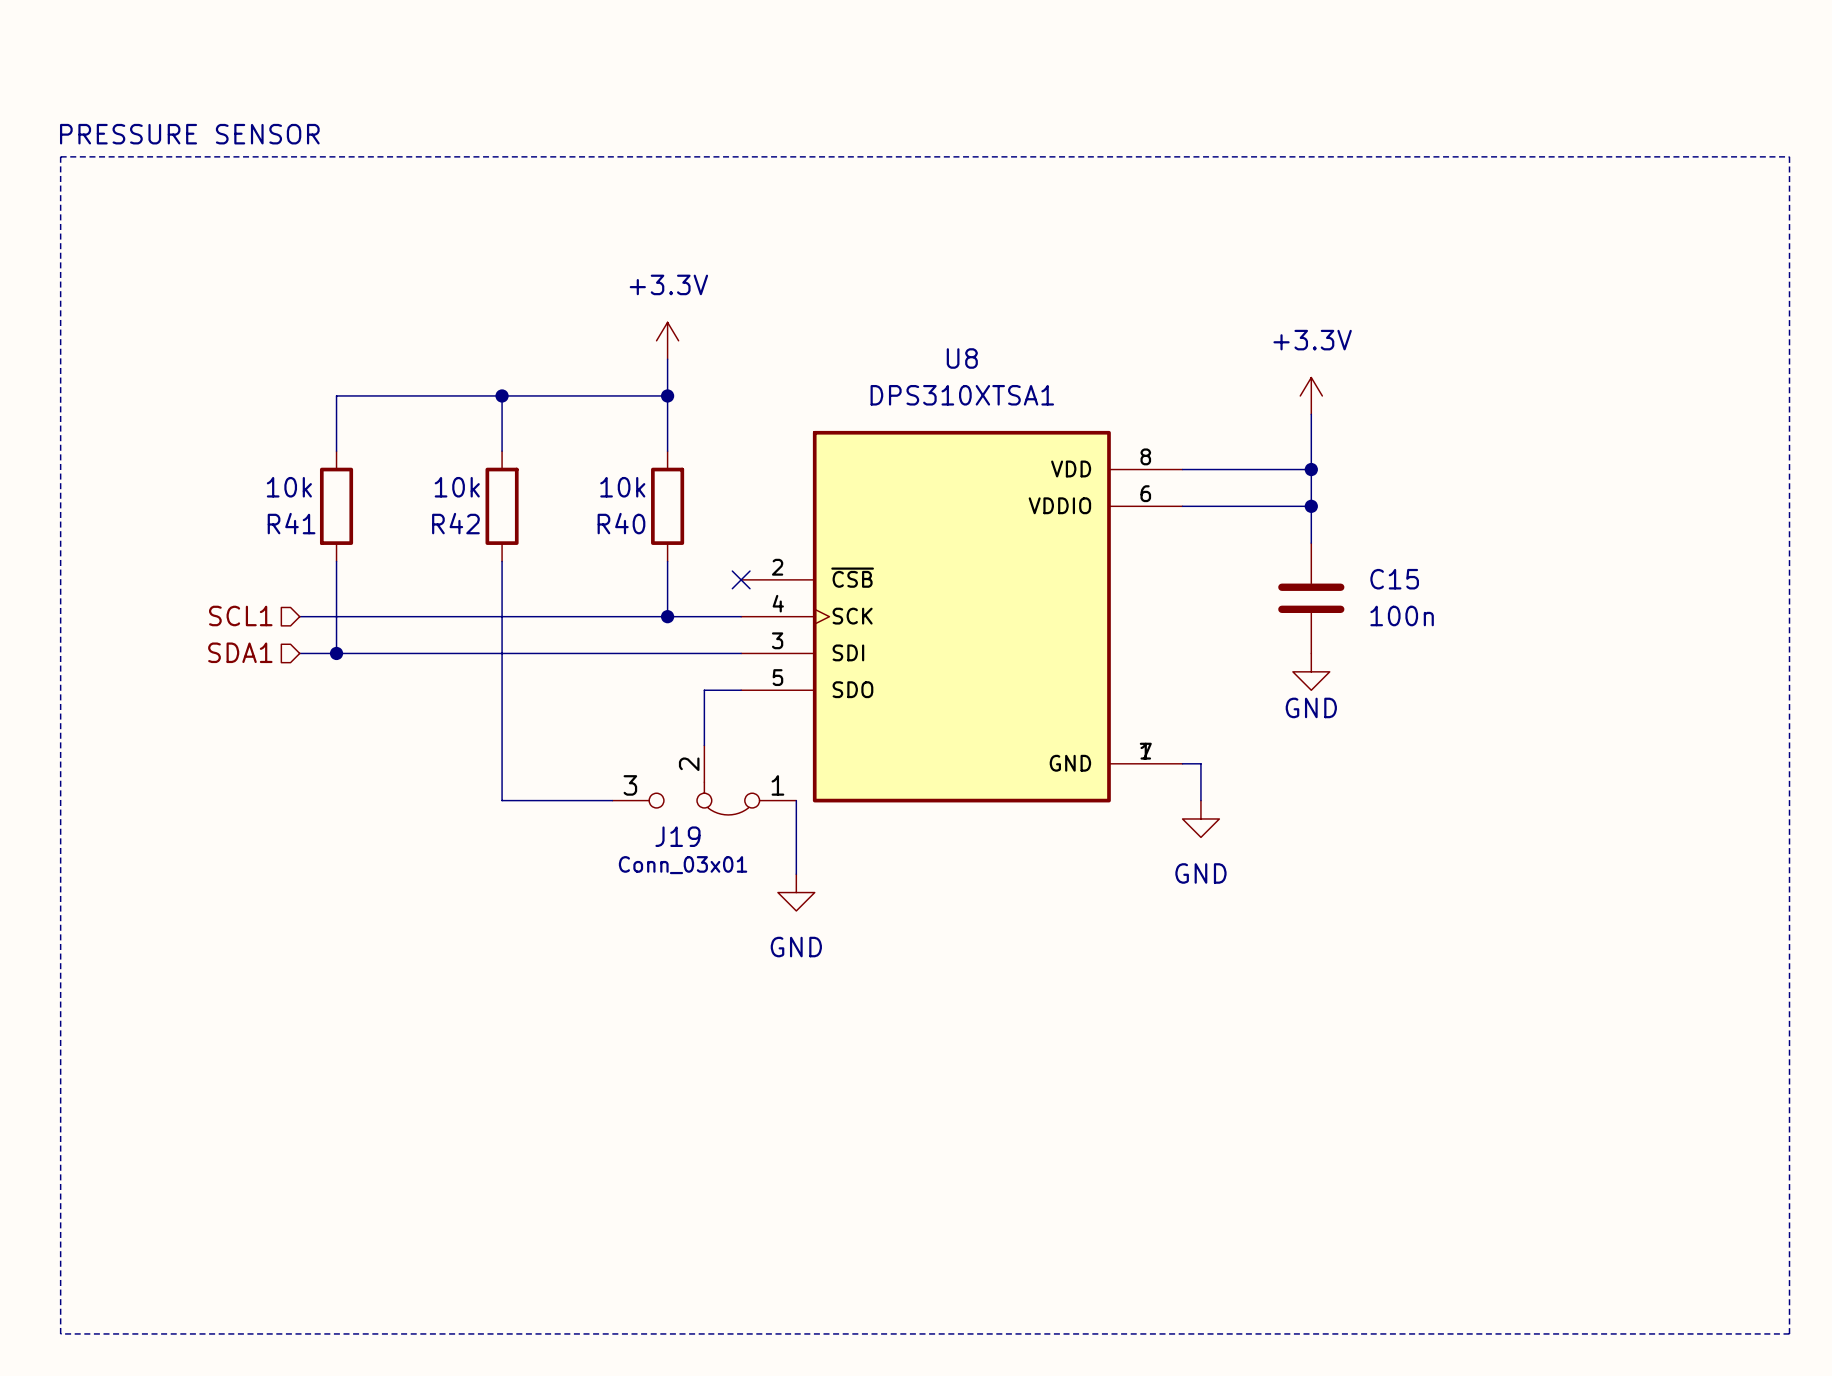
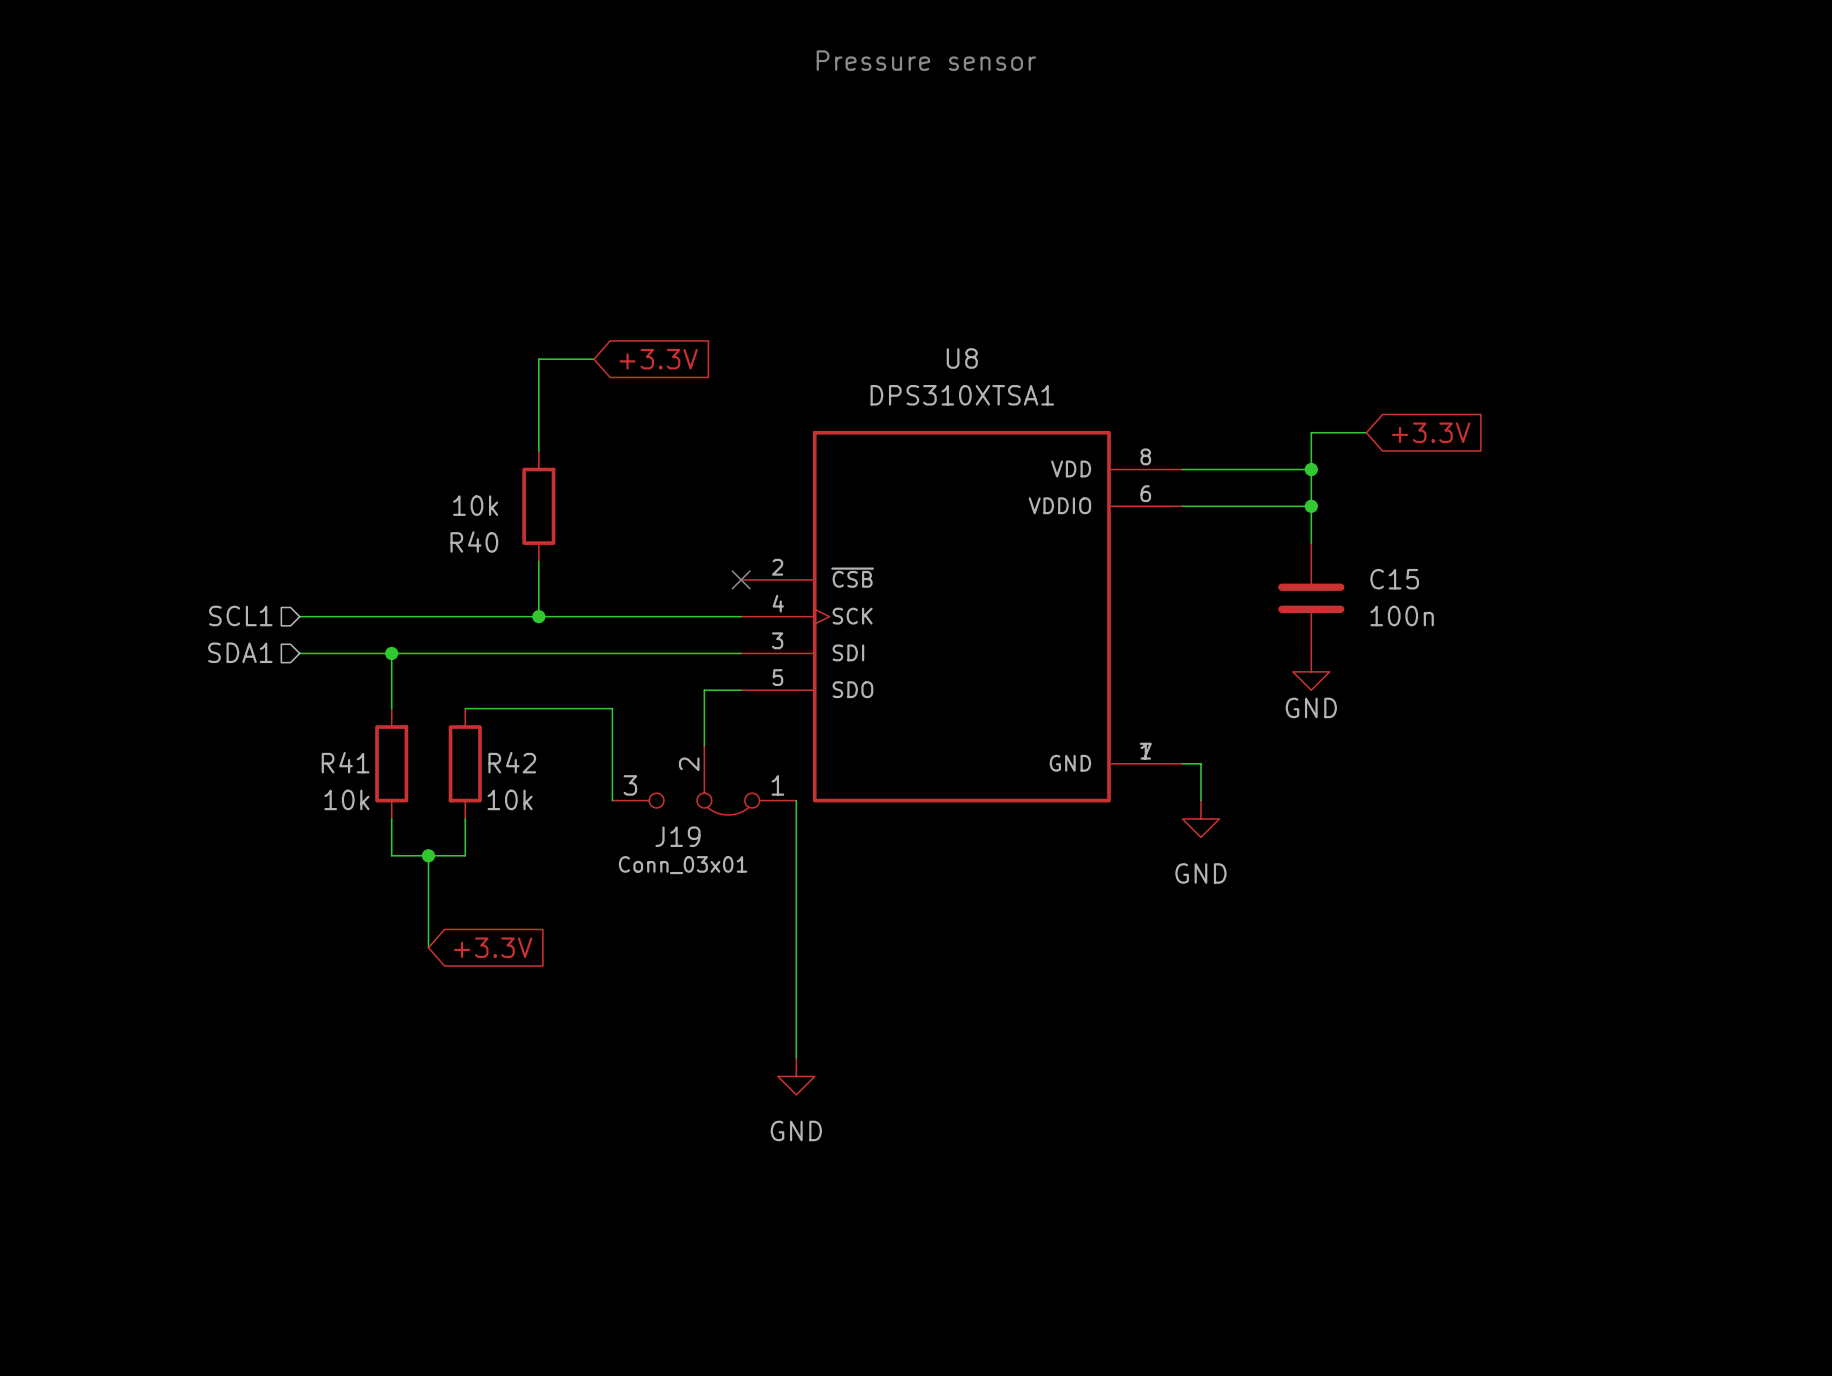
text: none -> Pressure sensor (926, 60)
text: PRESSURE SENSOR (189, 134) -> none
line: (60, 156) (1789, 156) (1789, 1333) (60, 1333) (60, 156) -> none
power symbol: +3.3V (667, 340) -> none
wire: none -> (594, 359) (538, 359) (538, 451)
global label: none -> +3.3V (658, 359)
wire: (667, 359) (667, 451) -> none
wire: (502, 395) (502, 451) -> (391, 653) (391, 708)
junction: (502, 395) -> none
wire: (667, 395) (336, 395) (336, 451) -> none
junction: (667, 395) -> none
power symbol: +3.3V (1311, 395) -> none
wire: (1311, 414) (1311, 432) -> (1366, 432) (1311, 432)
global label: none -> +3.3V (1431, 432)
R41 value position: 10k (289, 487) -> 10k (346, 799)
R42 value position: 10k (457, 487) -> 10k (510, 799)
R40 value position: 10k (622, 487) -> 10k (475, 505)
R41 position: (336, 506) -> (391, 763)
R42 position: (502, 506) -> (465, 763)
R40 position: (667, 506) -> (538, 506)
R41 name position: R41 (291, 523) -> R41 (345, 762)
R42 name position: R42 (455, 523) -> R42 (512, 762)
R40 name position: R40 (621, 523) -> R40 (474, 541)
wire: (336, 561) (336, 653) -> (428, 855) (428, 947)
wire: (502, 561) (502, 800) (612, 800) -> (465, 708) (612, 708) (612, 800)
wire: (667, 561) (667, 616) -> (538, 561) (538, 616)
junction: none -> (538, 616)
junction: (667, 616) -> none
junction position: (336, 653) -> (391, 653)
wire: none -> (391, 818) (391, 855) (465, 855) (465, 818)
junction: none -> (428, 855)
wire: none -> (796, 874) (796, 1058)
power symbol position: GND (796, 892) -> GND (796, 1076)
global label: none -> +3.3V (493, 947)

